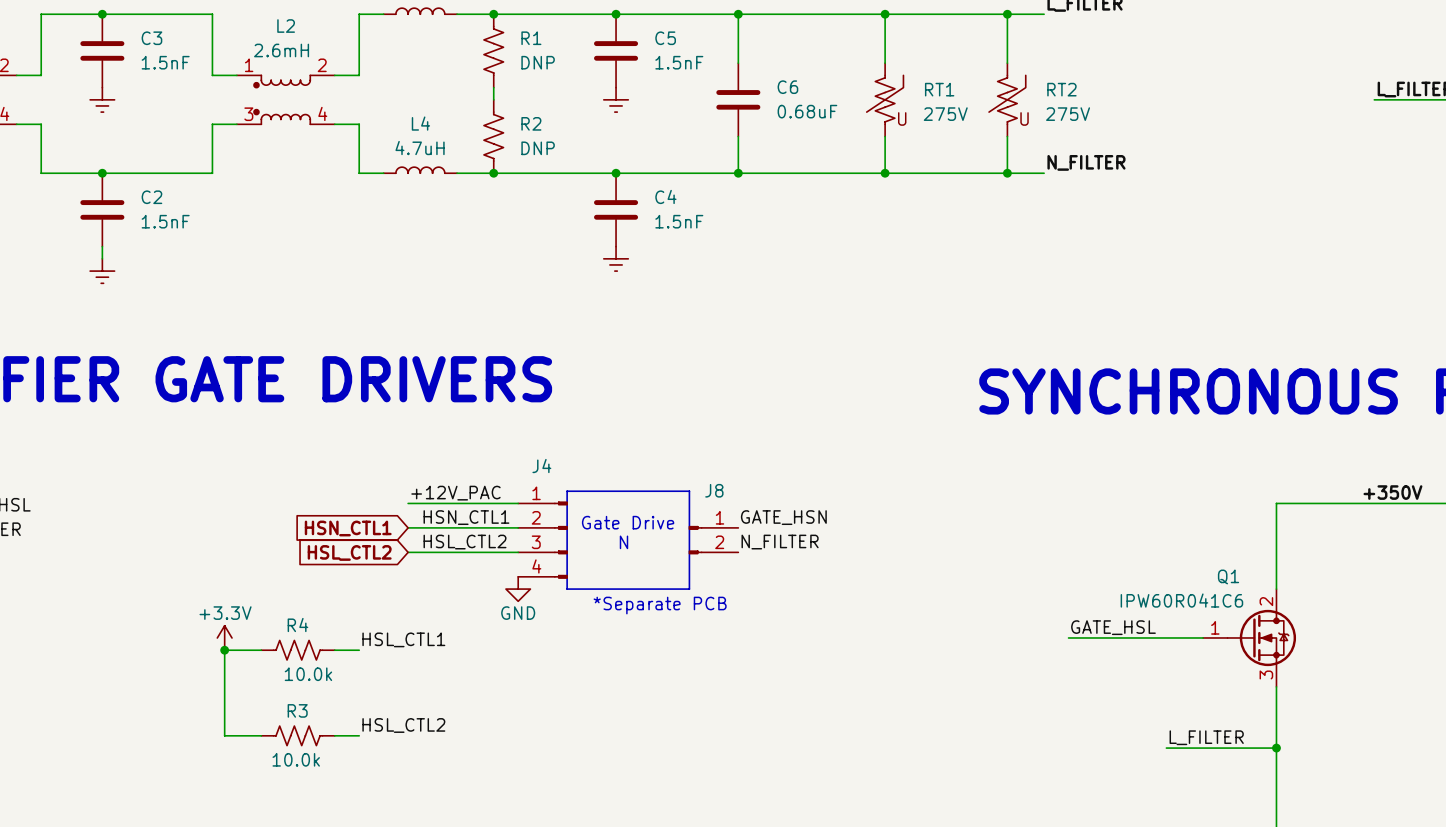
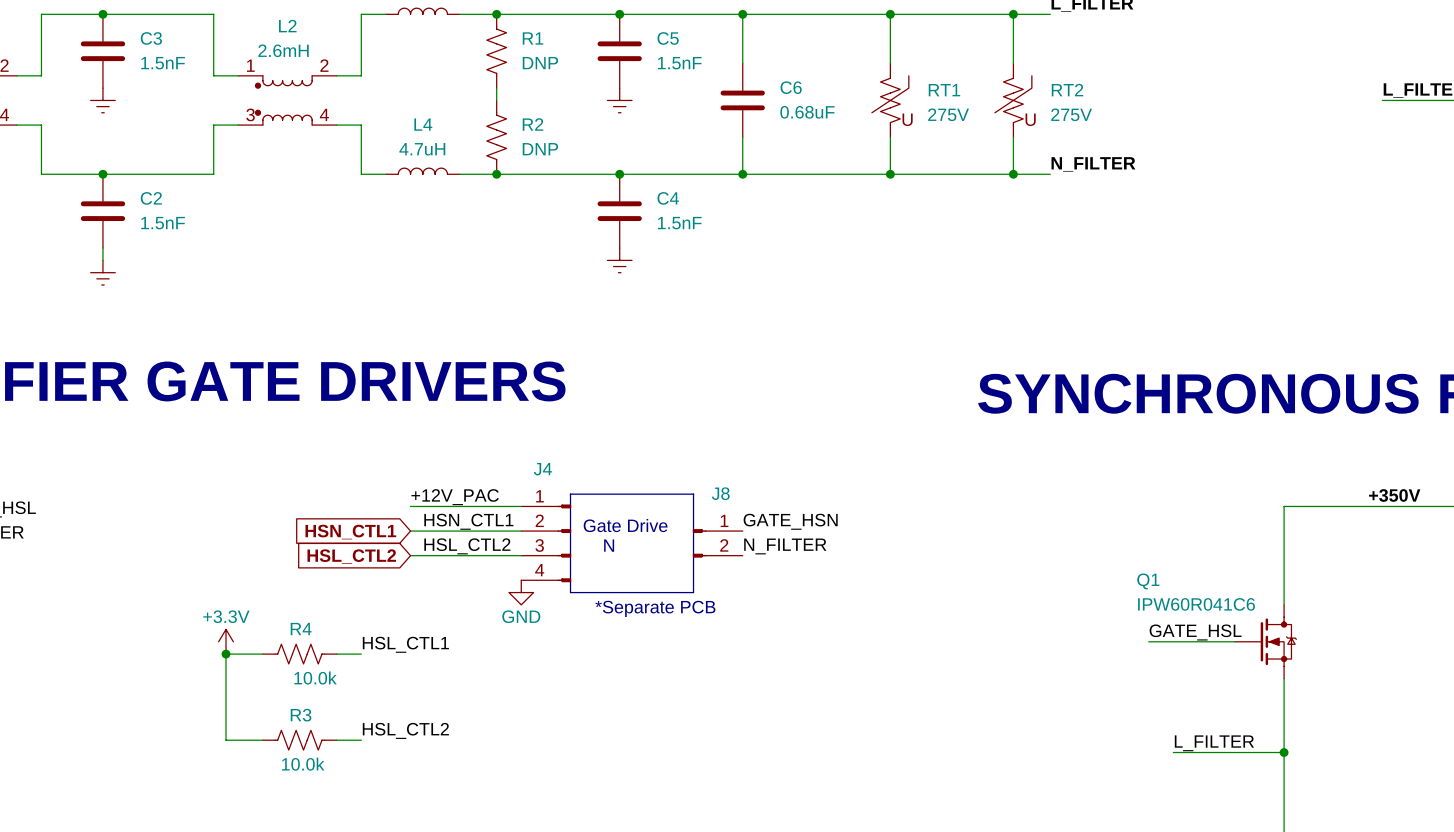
Q1 name position: Q1 (1228, 576) -> Q1 (1148, 581)
Q1 symbol: [1203, 589, 1297, 687] -> [1234, 604, 1297, 679]
label position: GATE_HSL (1113, 627) -> GATE_HSL (1195, 632)
wire: (1068, 637) (1141, 637) -> none

